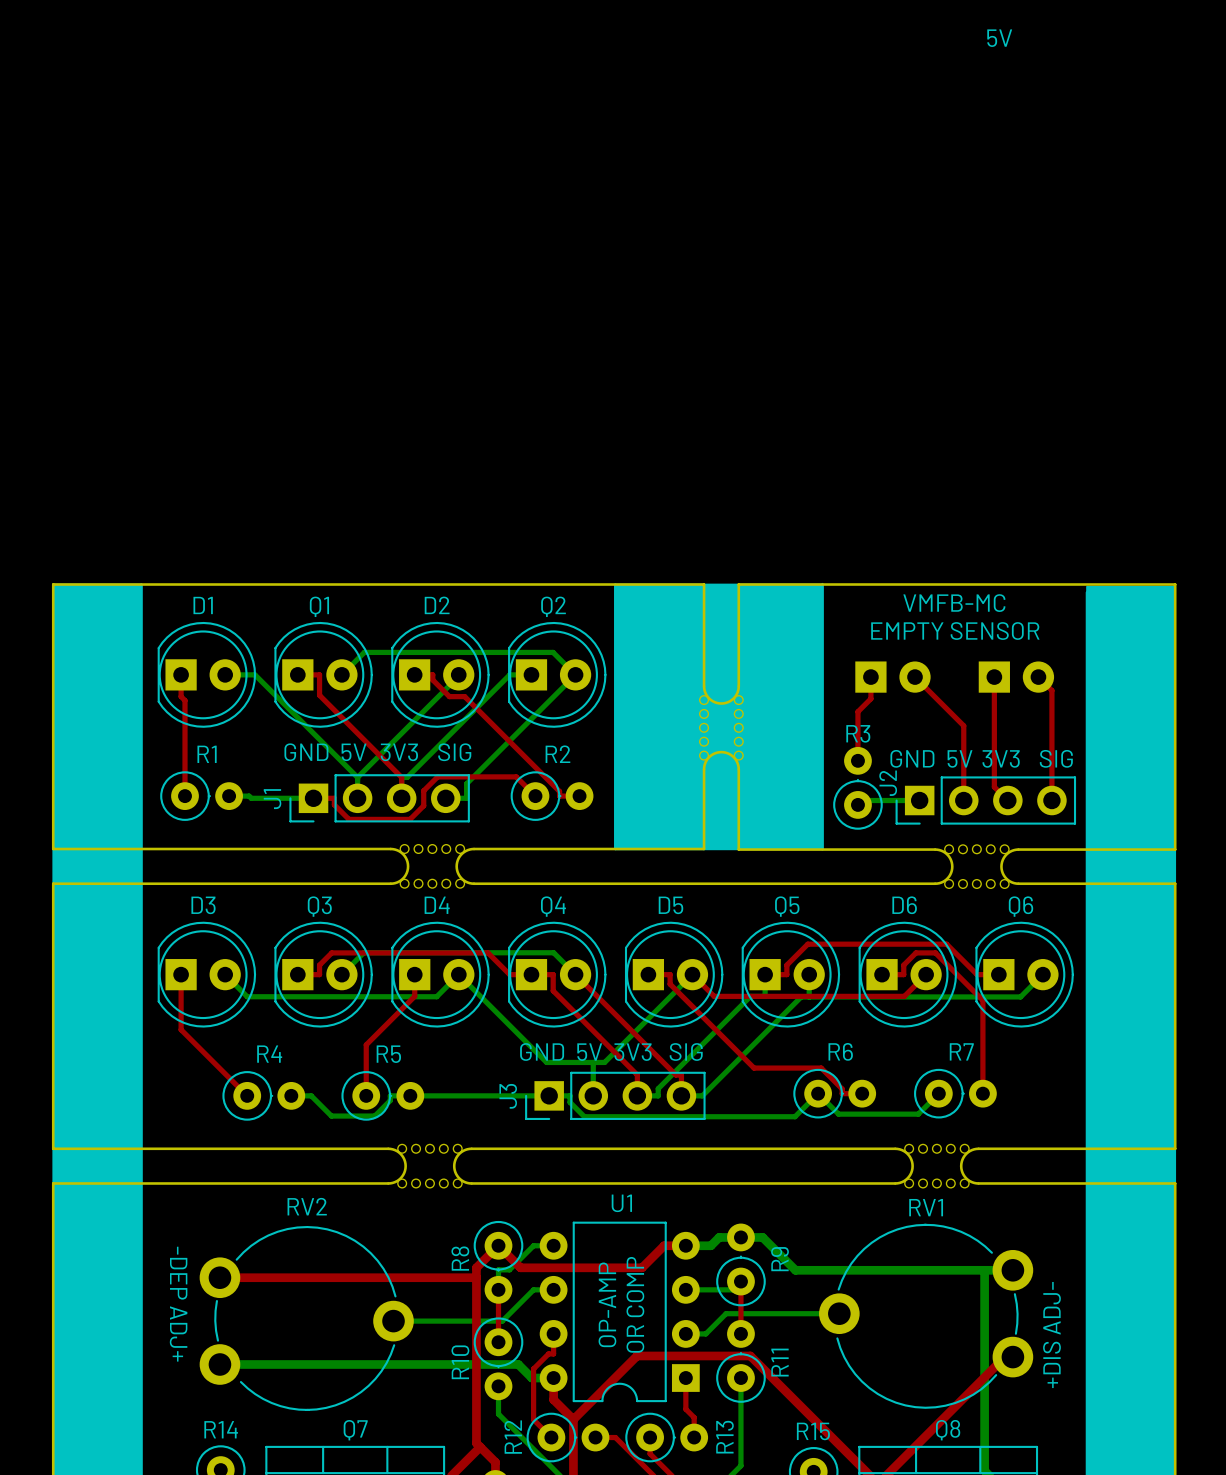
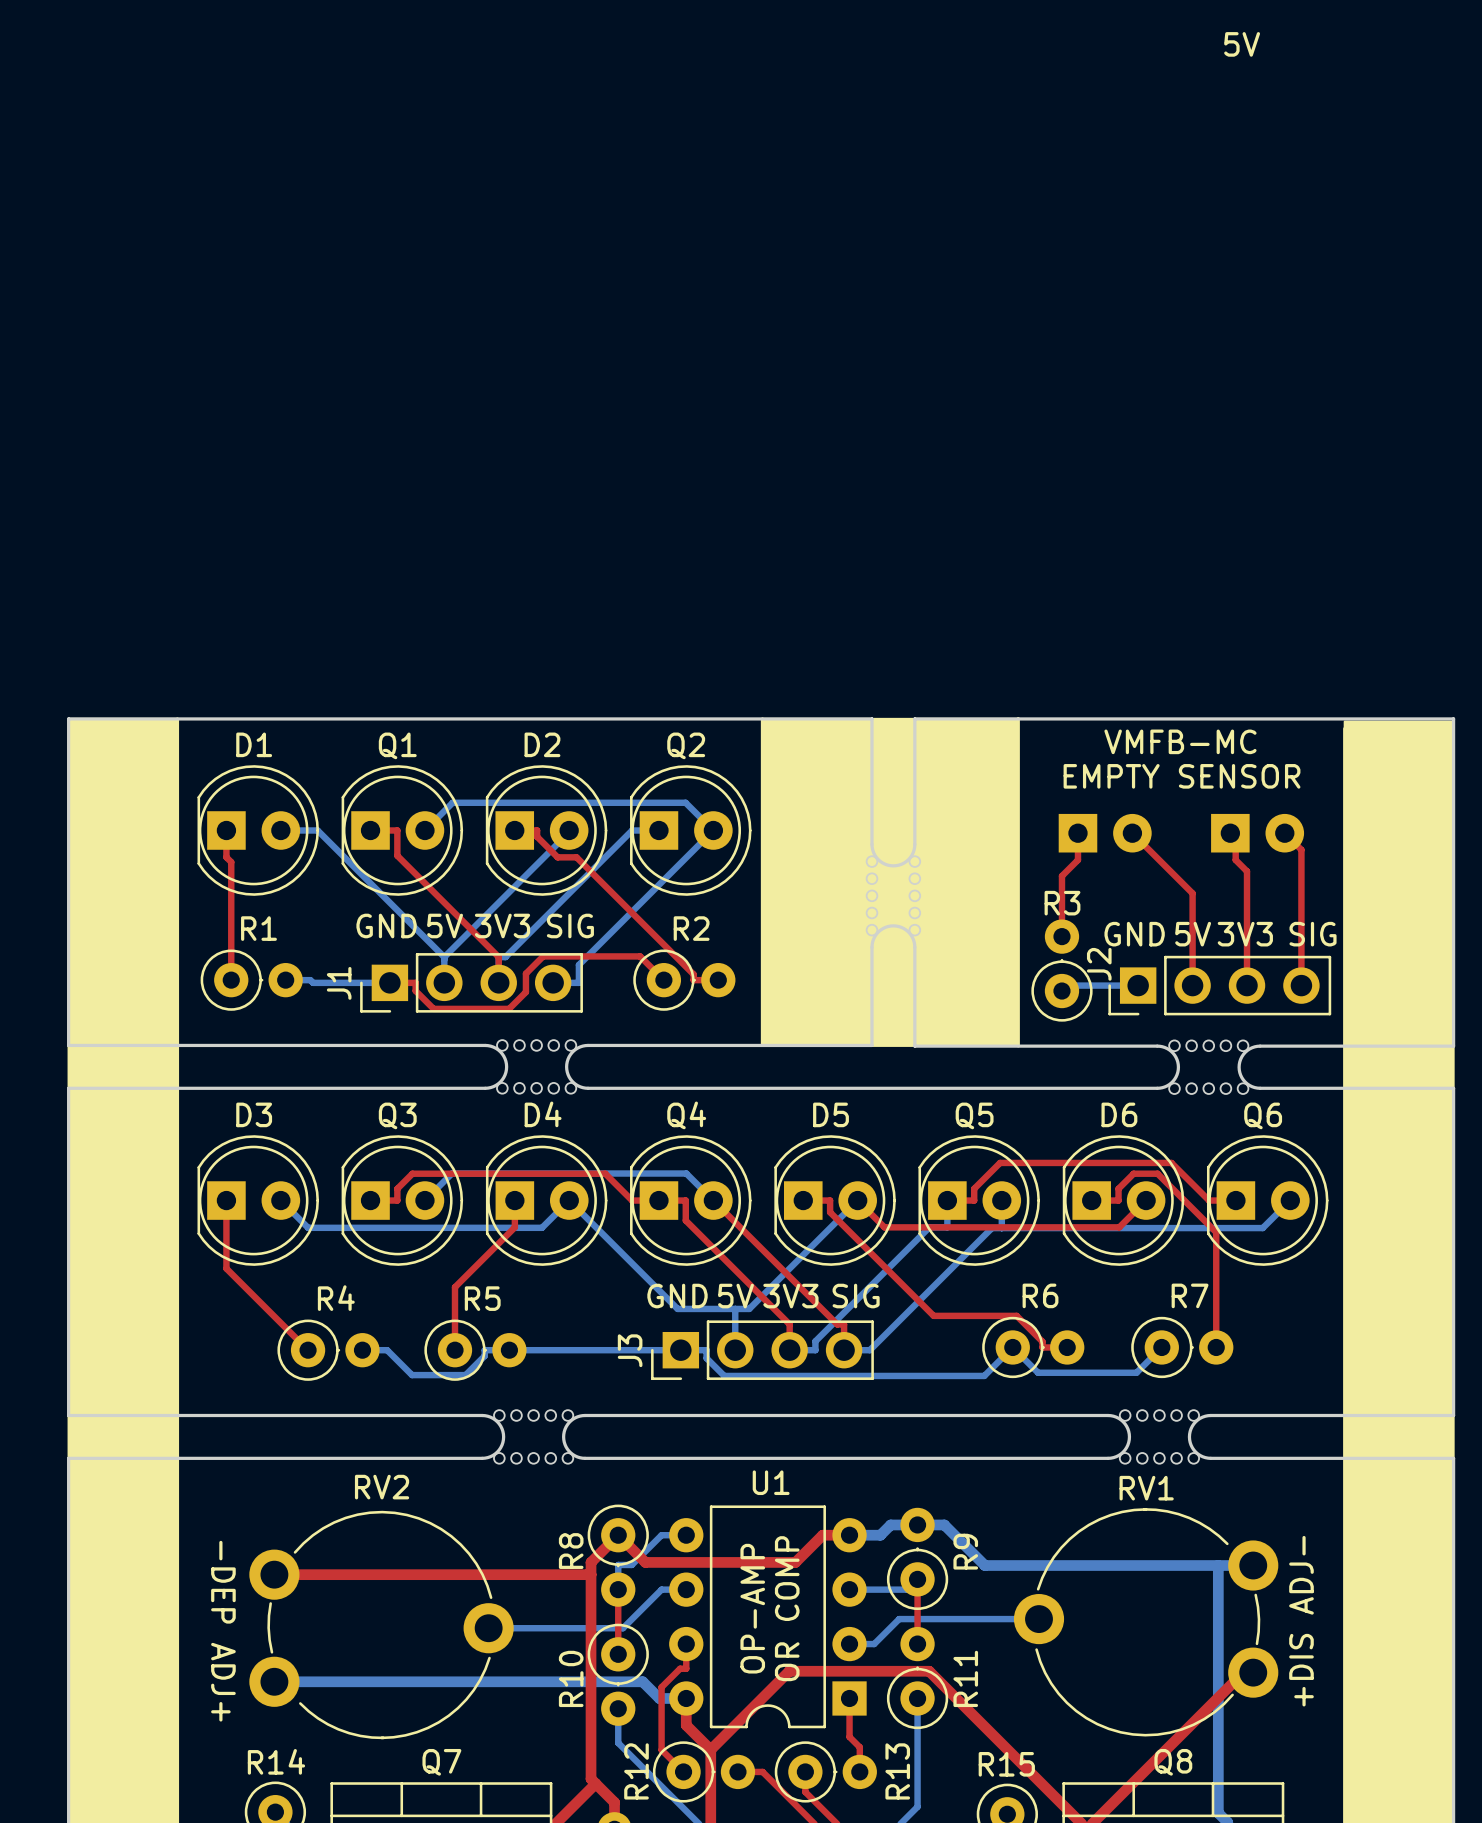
top track: (994, 677) (994, 787) (1007, 800) -> (1235, 833) (1235, 860) (1247, 871) (1247, 985)

